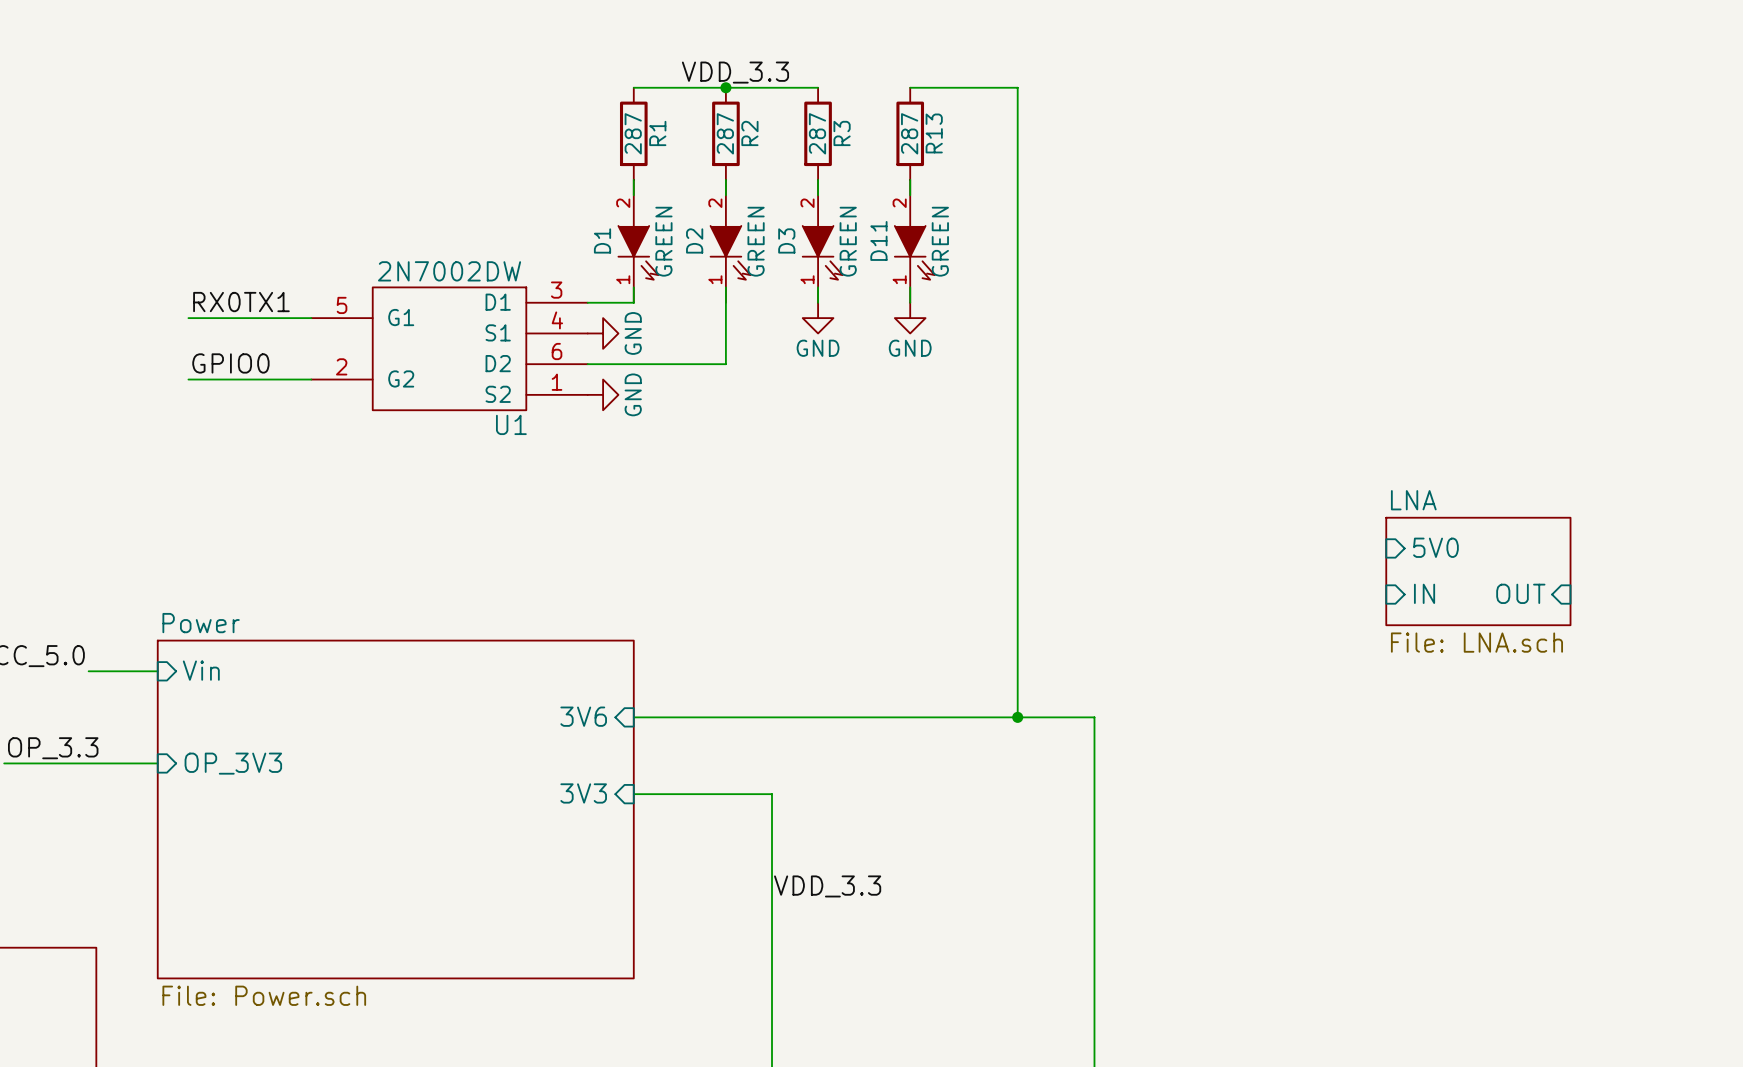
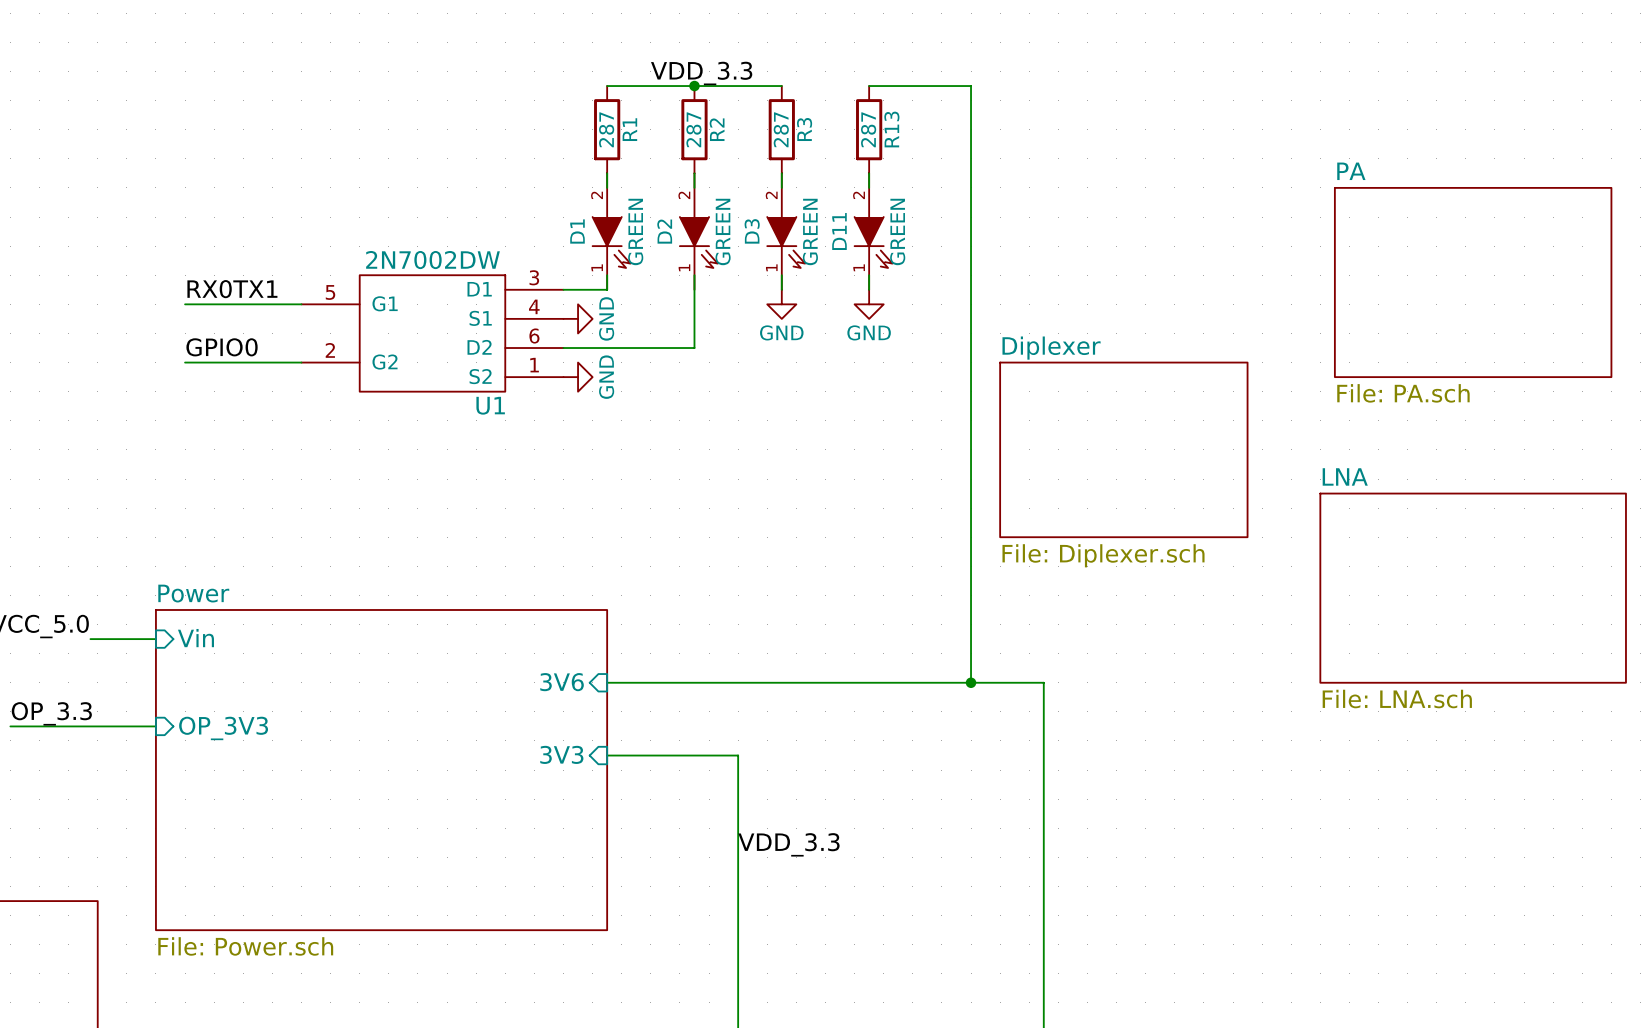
sheet PA: none -> File: PA.sch (1473, 282)
sheet Diplexer: none -> File: Diplexer.sch (1123, 449)
sheet pin: 5V0 (1435, 547) -> none
sheet LNA: File: LNA.sch (1478, 571) -> none
sheet pin: IN (1424, 593) -> none
sheet pin: OUT (1520, 593) -> none
sheet LNA: none -> File: LNA.sch (1473, 588)

